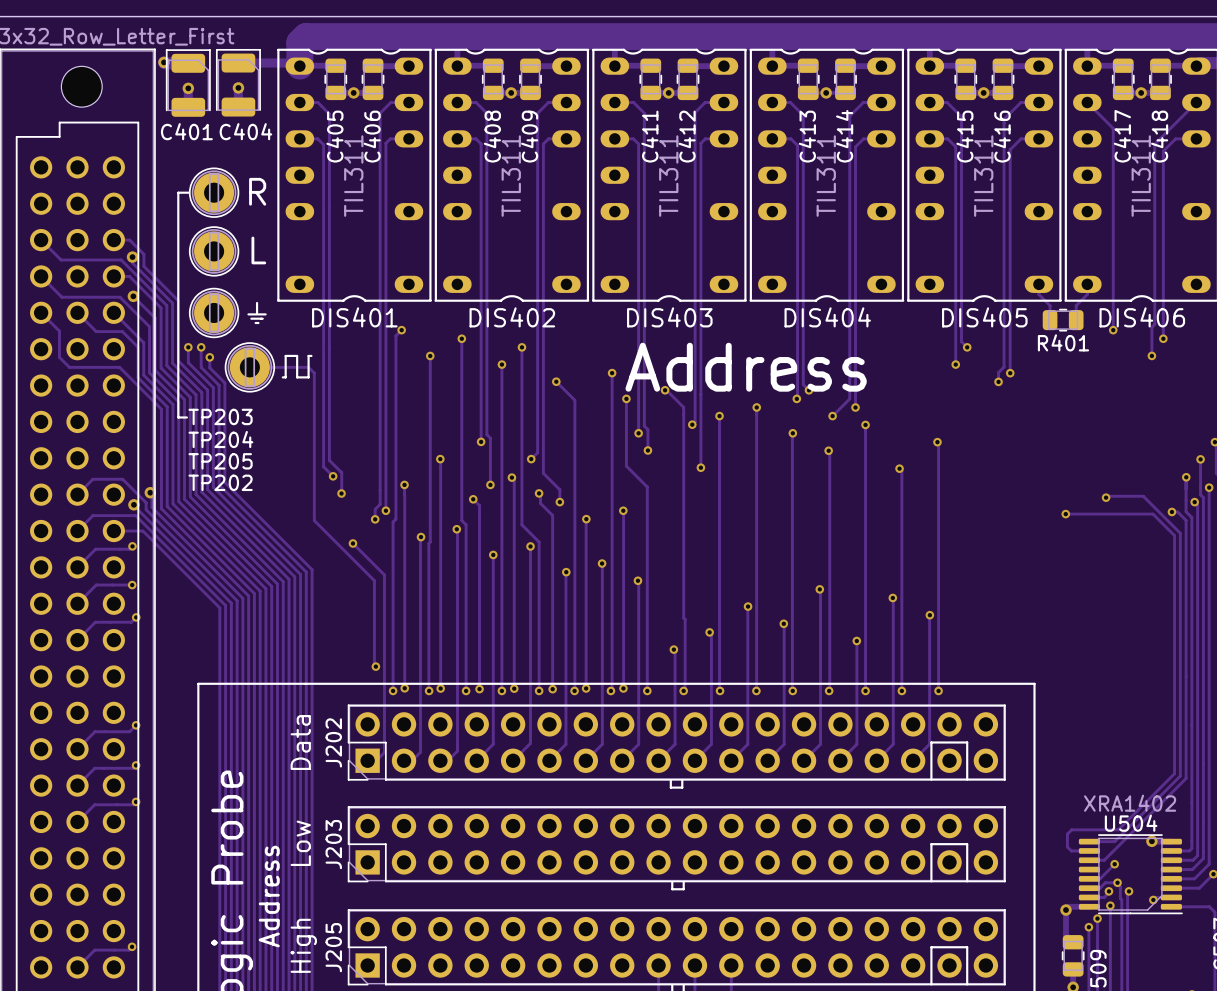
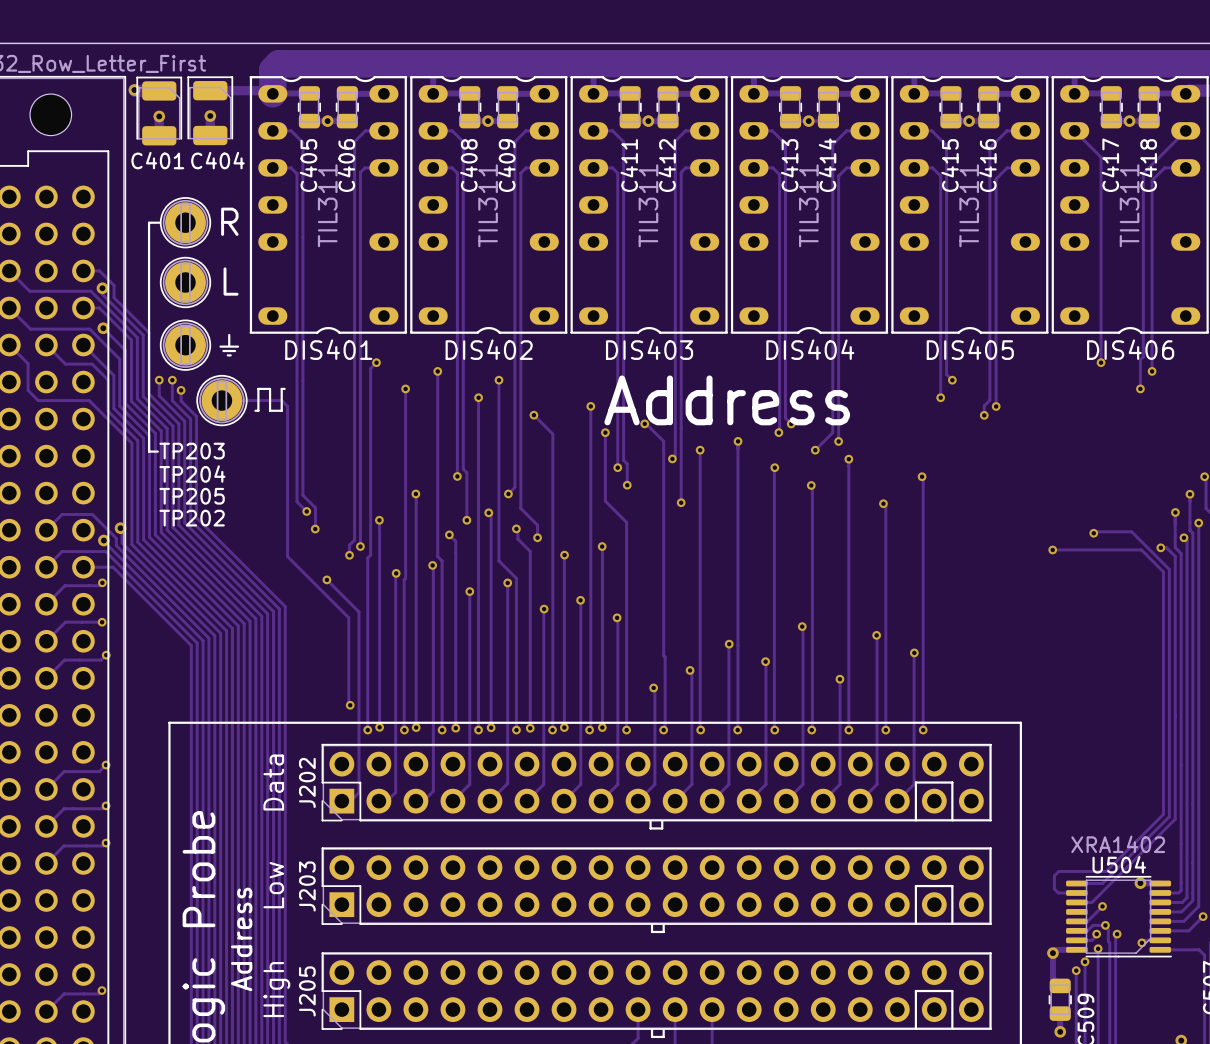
track: (1038, 284) (1038, 294) (1050, 305) (1050, 320) -> none
track: (1087, 284) (1087, 294) (1076, 305) (1076, 320) -> none
R401: (1063, 320) -> none

